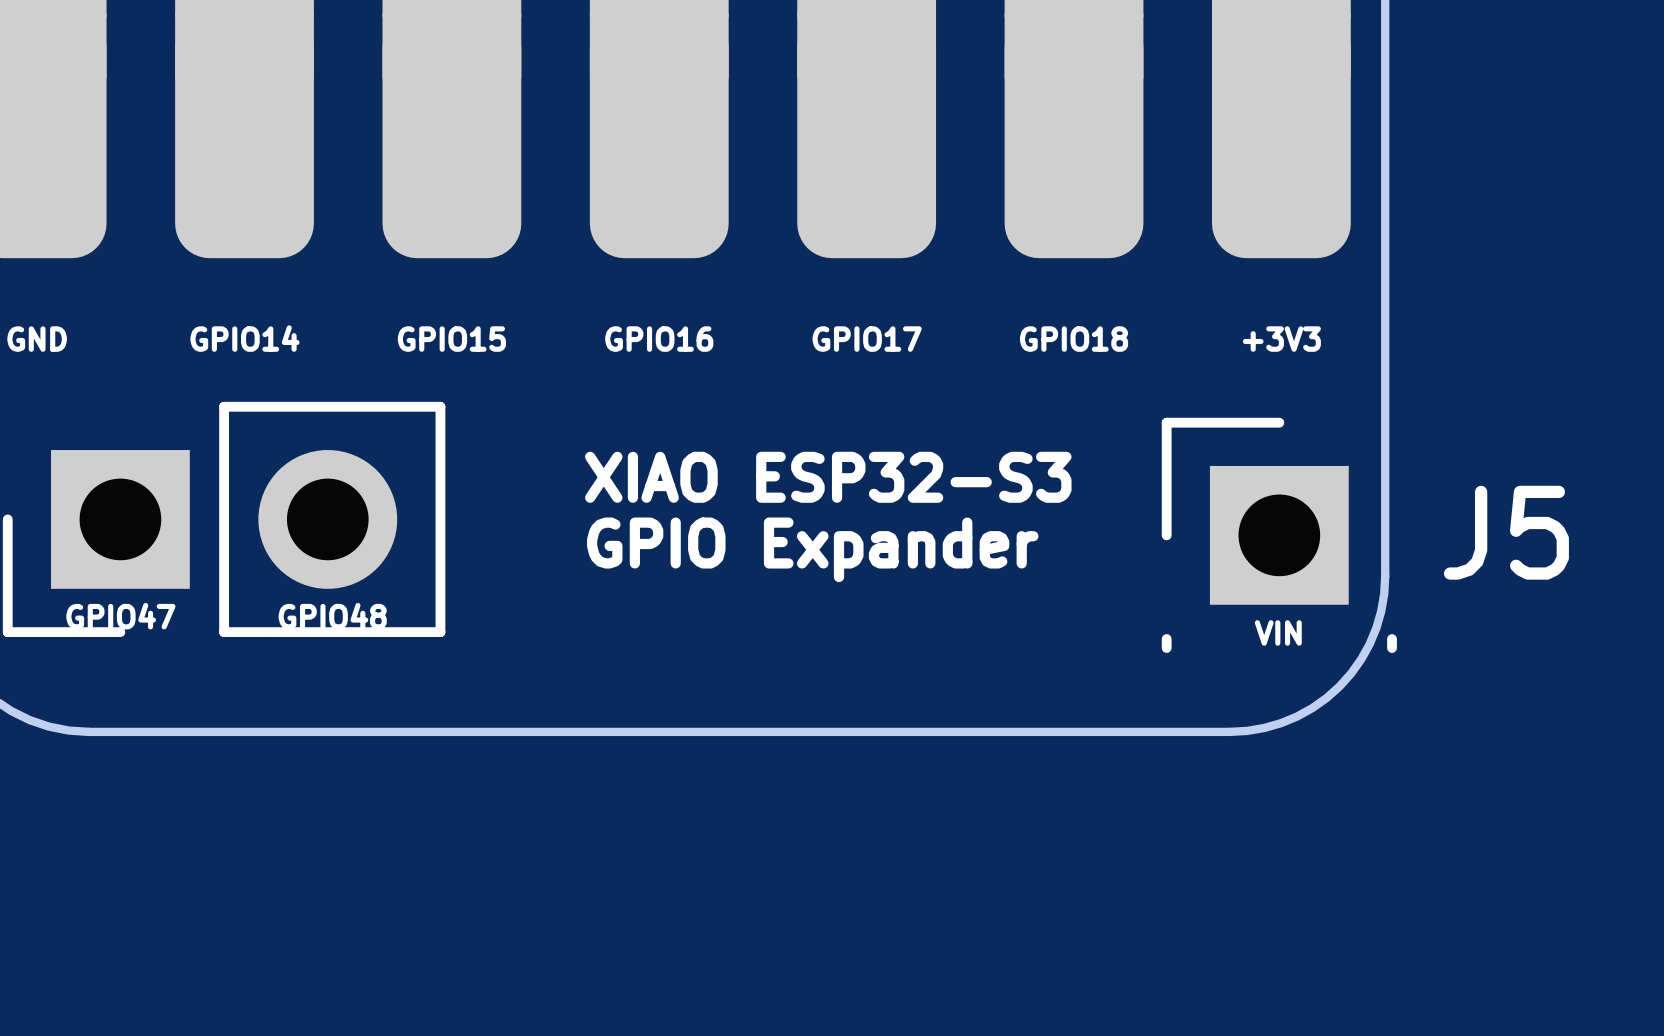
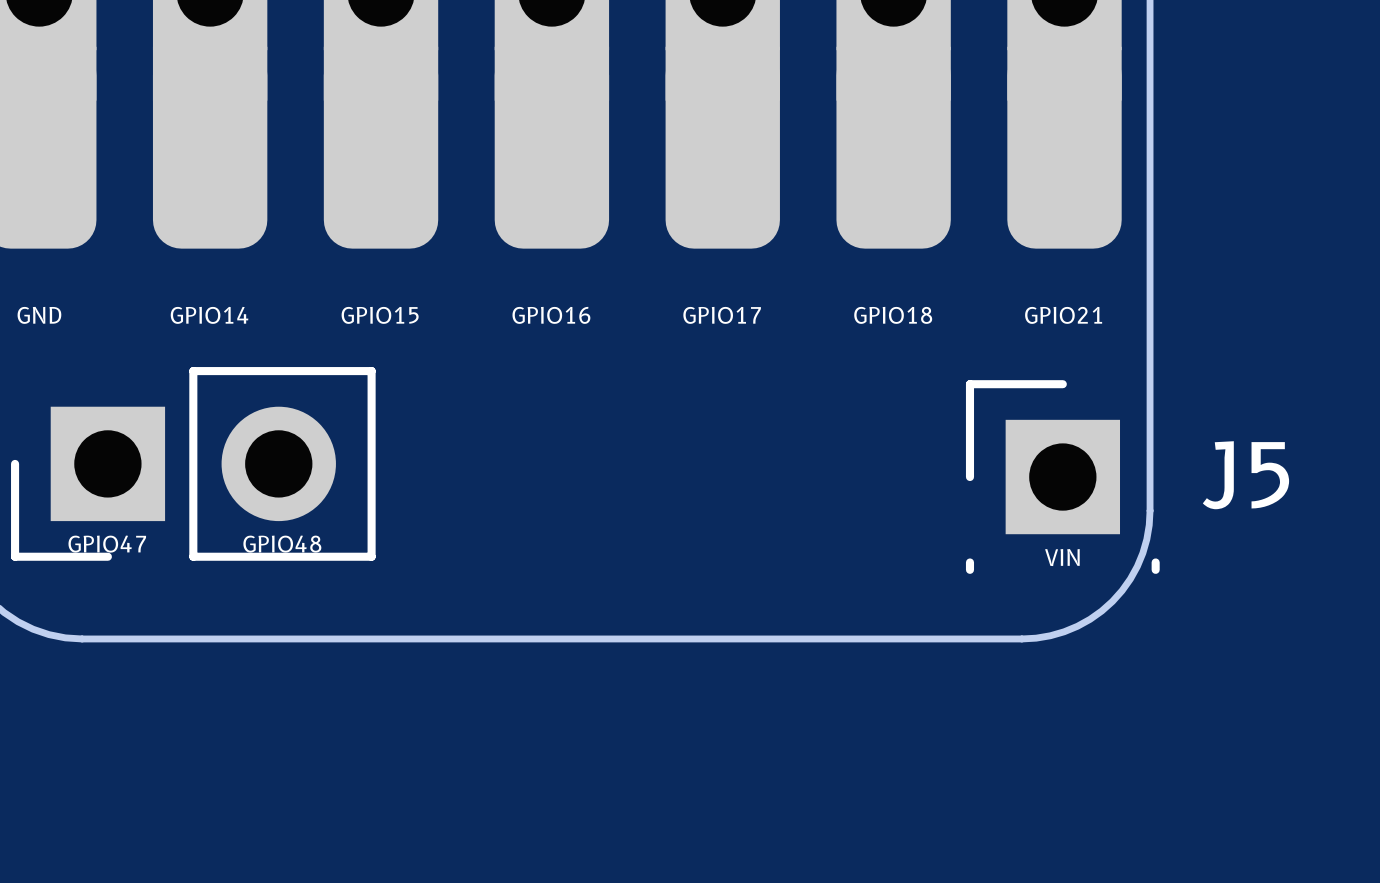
+3V3 name: +3V3 (1281, 339) -> GPIO21 (1063, 315)
text: XIAO ESP32-S3 (828, 477) -> none
text: GPIO Expander (812, 549) -> none

